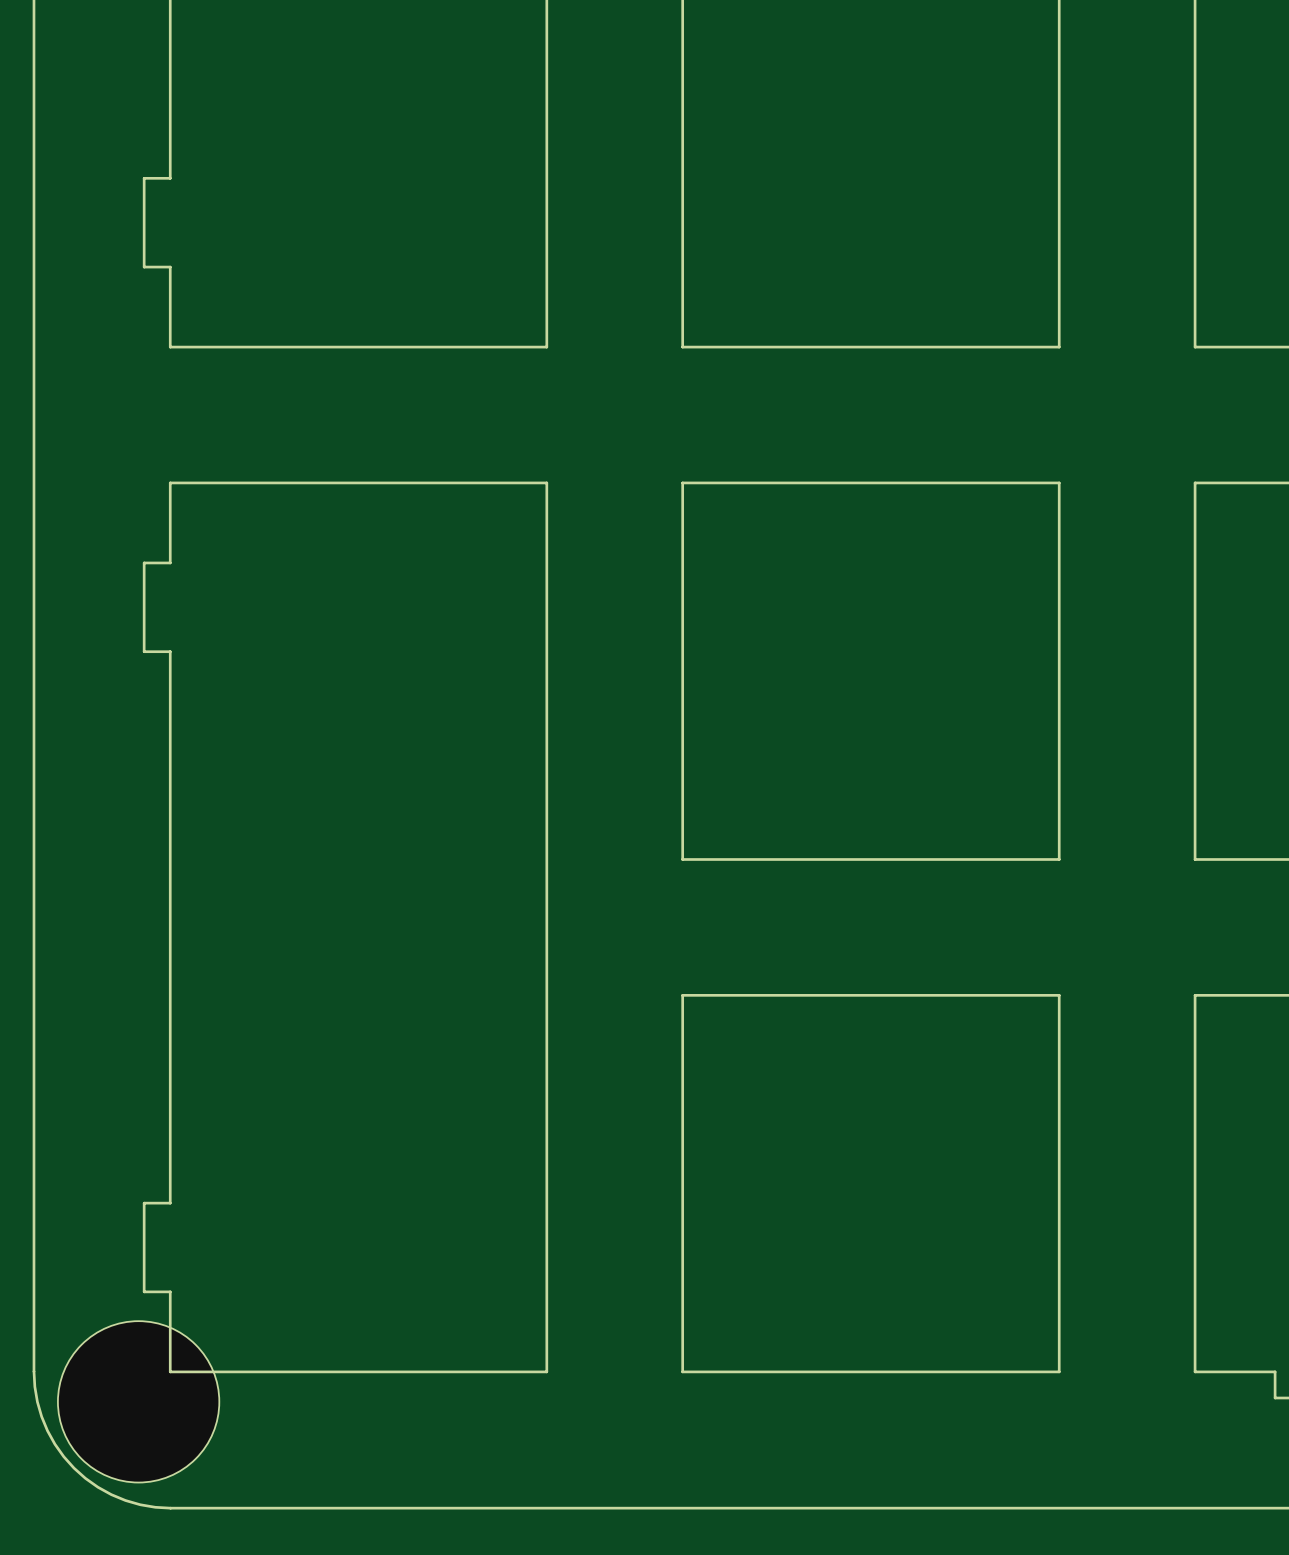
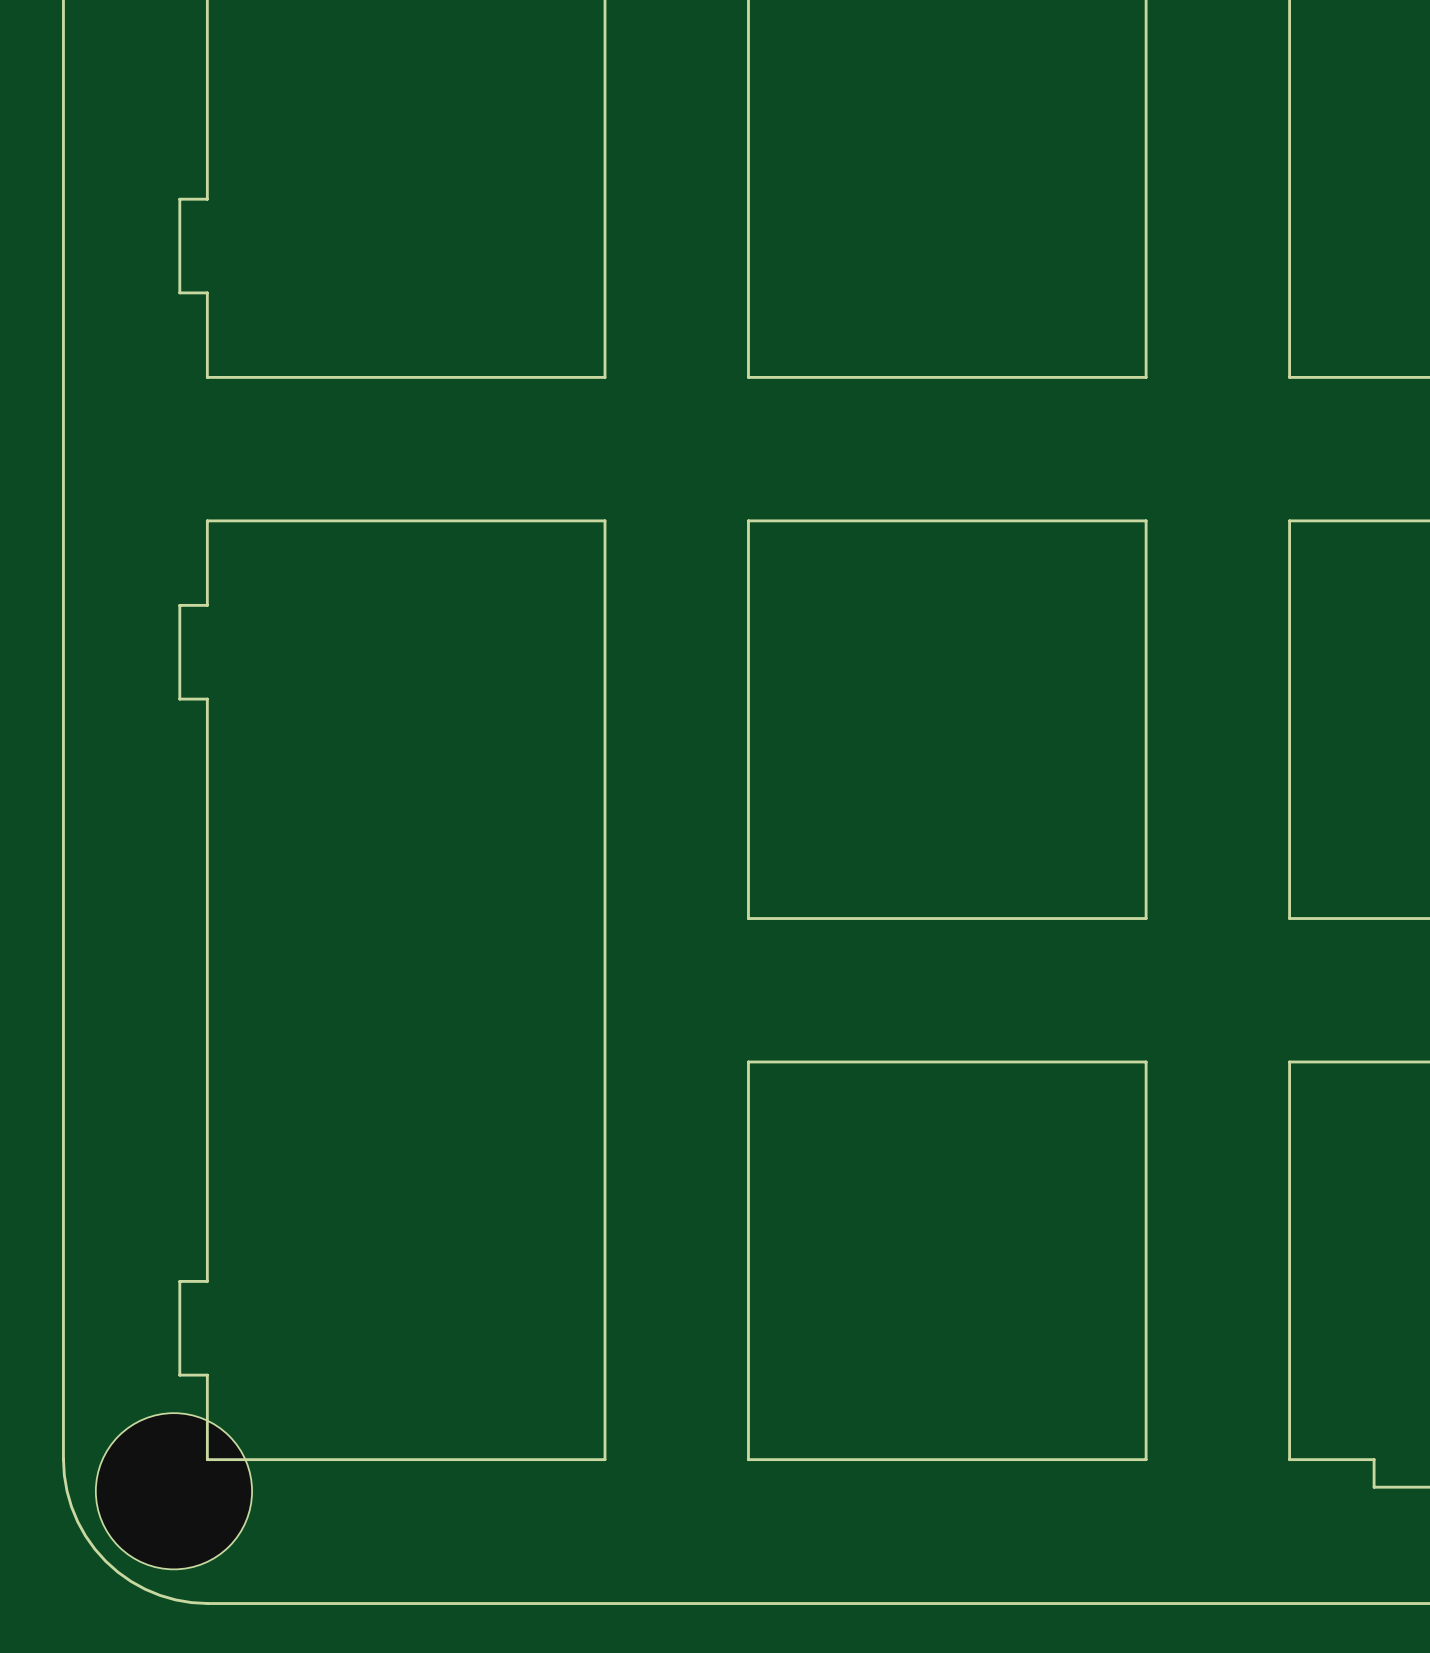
part footprint: [57, 1321, 220, 1483] -> [95, 1413, 253, 1570]

